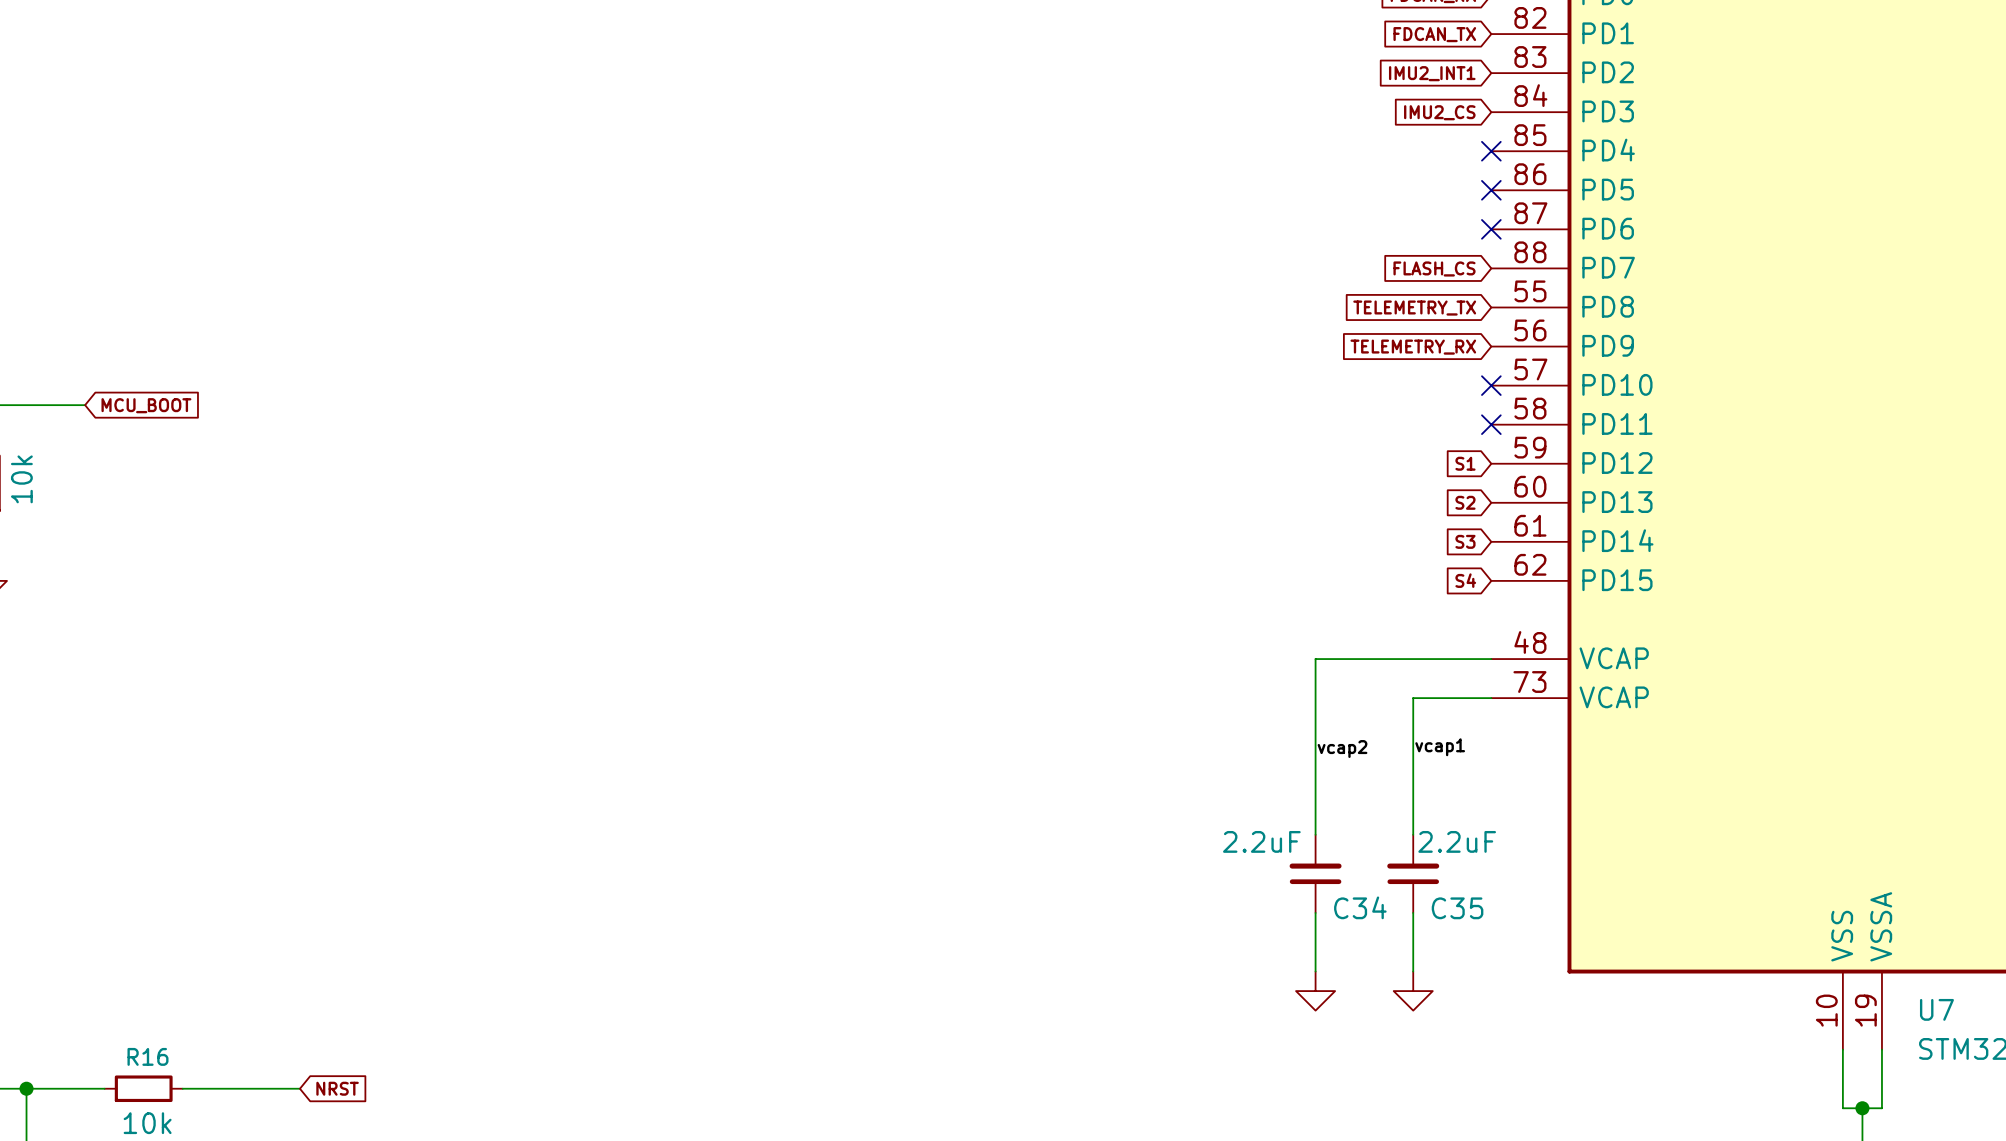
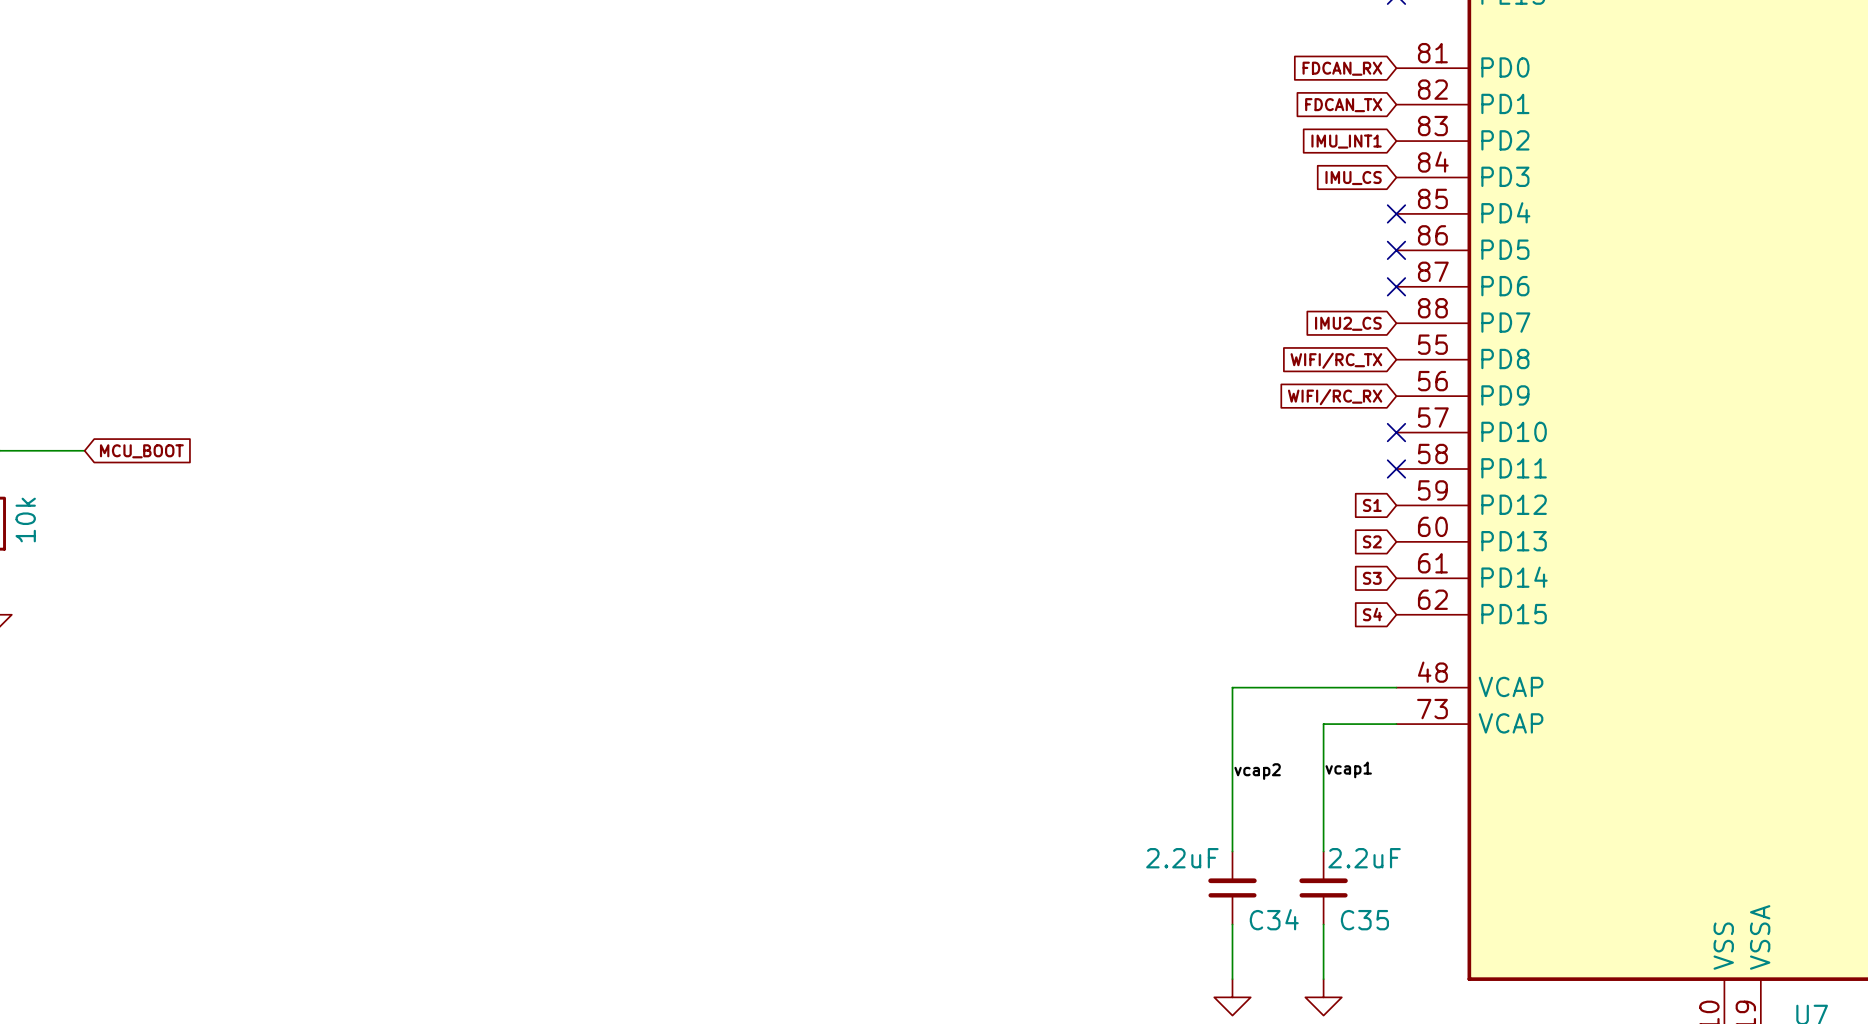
global label: IMU2_INT1 (1432, 73) -> IMU_INT1 (1346, 141)
global label: IMU2_CS (1439, 112) -> IMU_CS (1353, 178)
global label: FLASH_CS (1434, 268) -> IMU2_CS (1348, 323)
global label: TELEMETRY_TX (1414, 308) -> WIFI/RC_TX (1336, 360)
global label: TELEMETRY_RX (1413, 347) -> WIFI/RC_RX (1335, 397)

